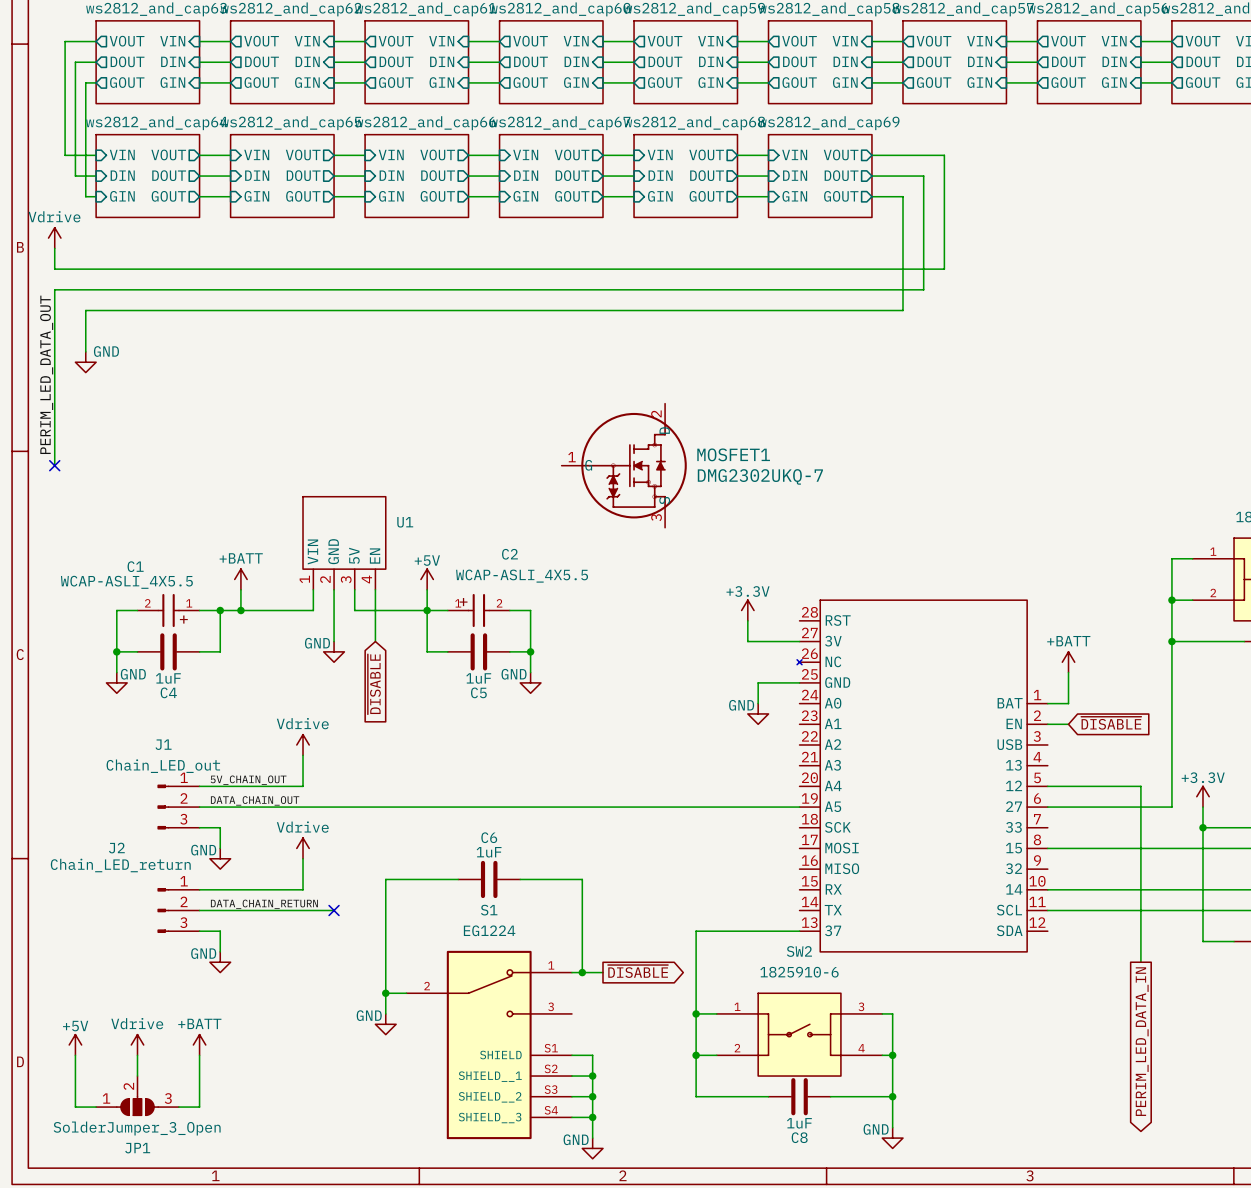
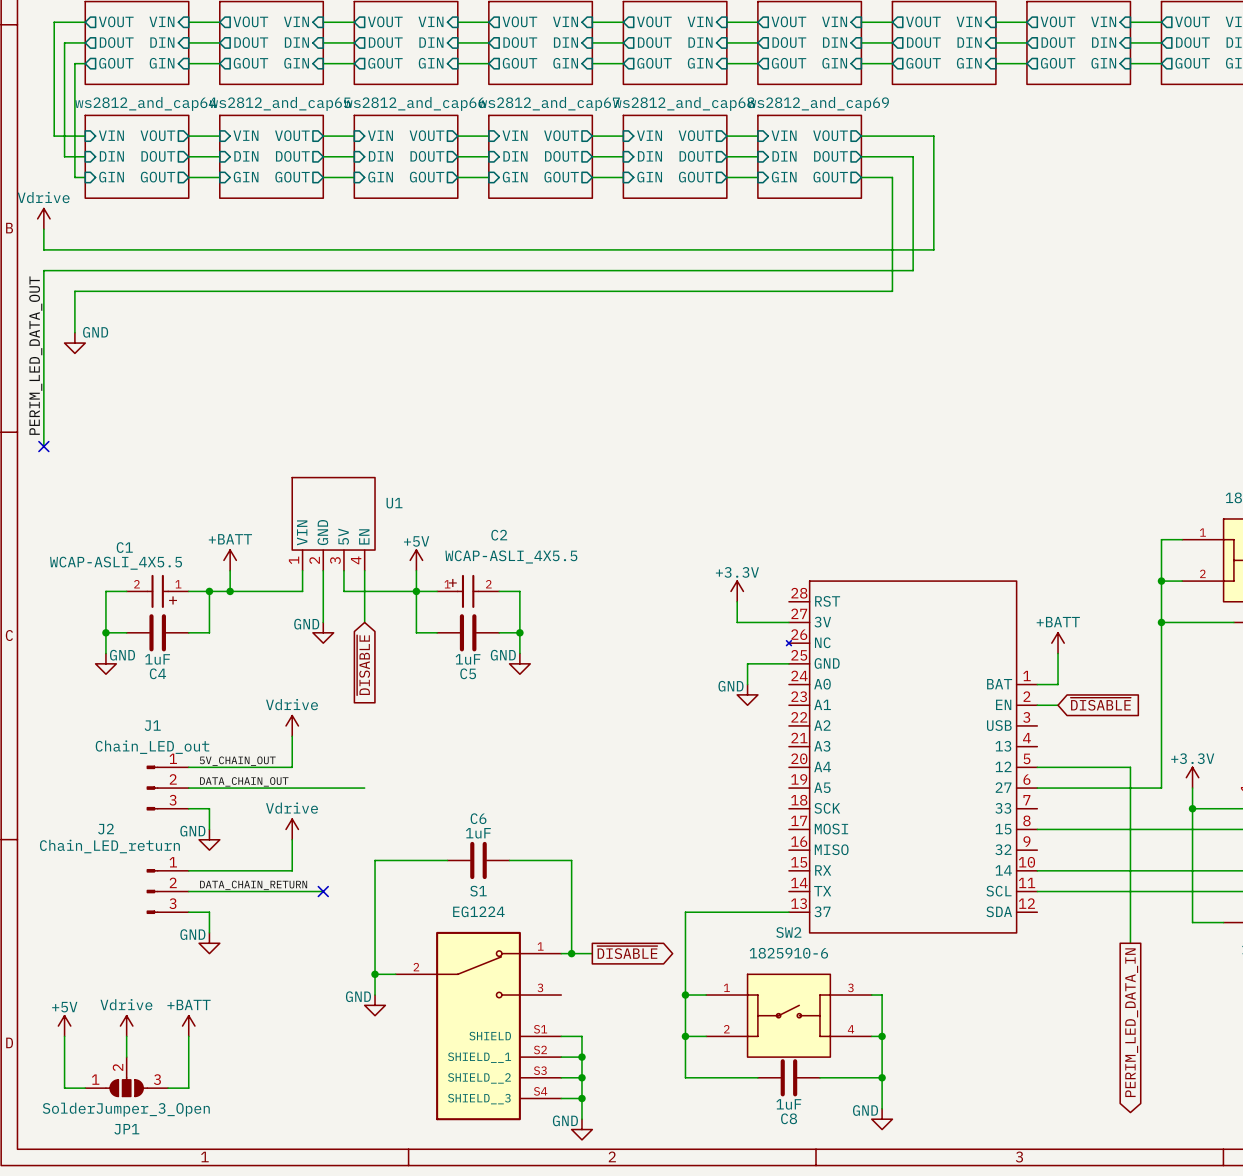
MOSFET1: DMG2302UKQ-7 (624, 465) -> none
wire: (375, 807) (799, 807) -> none

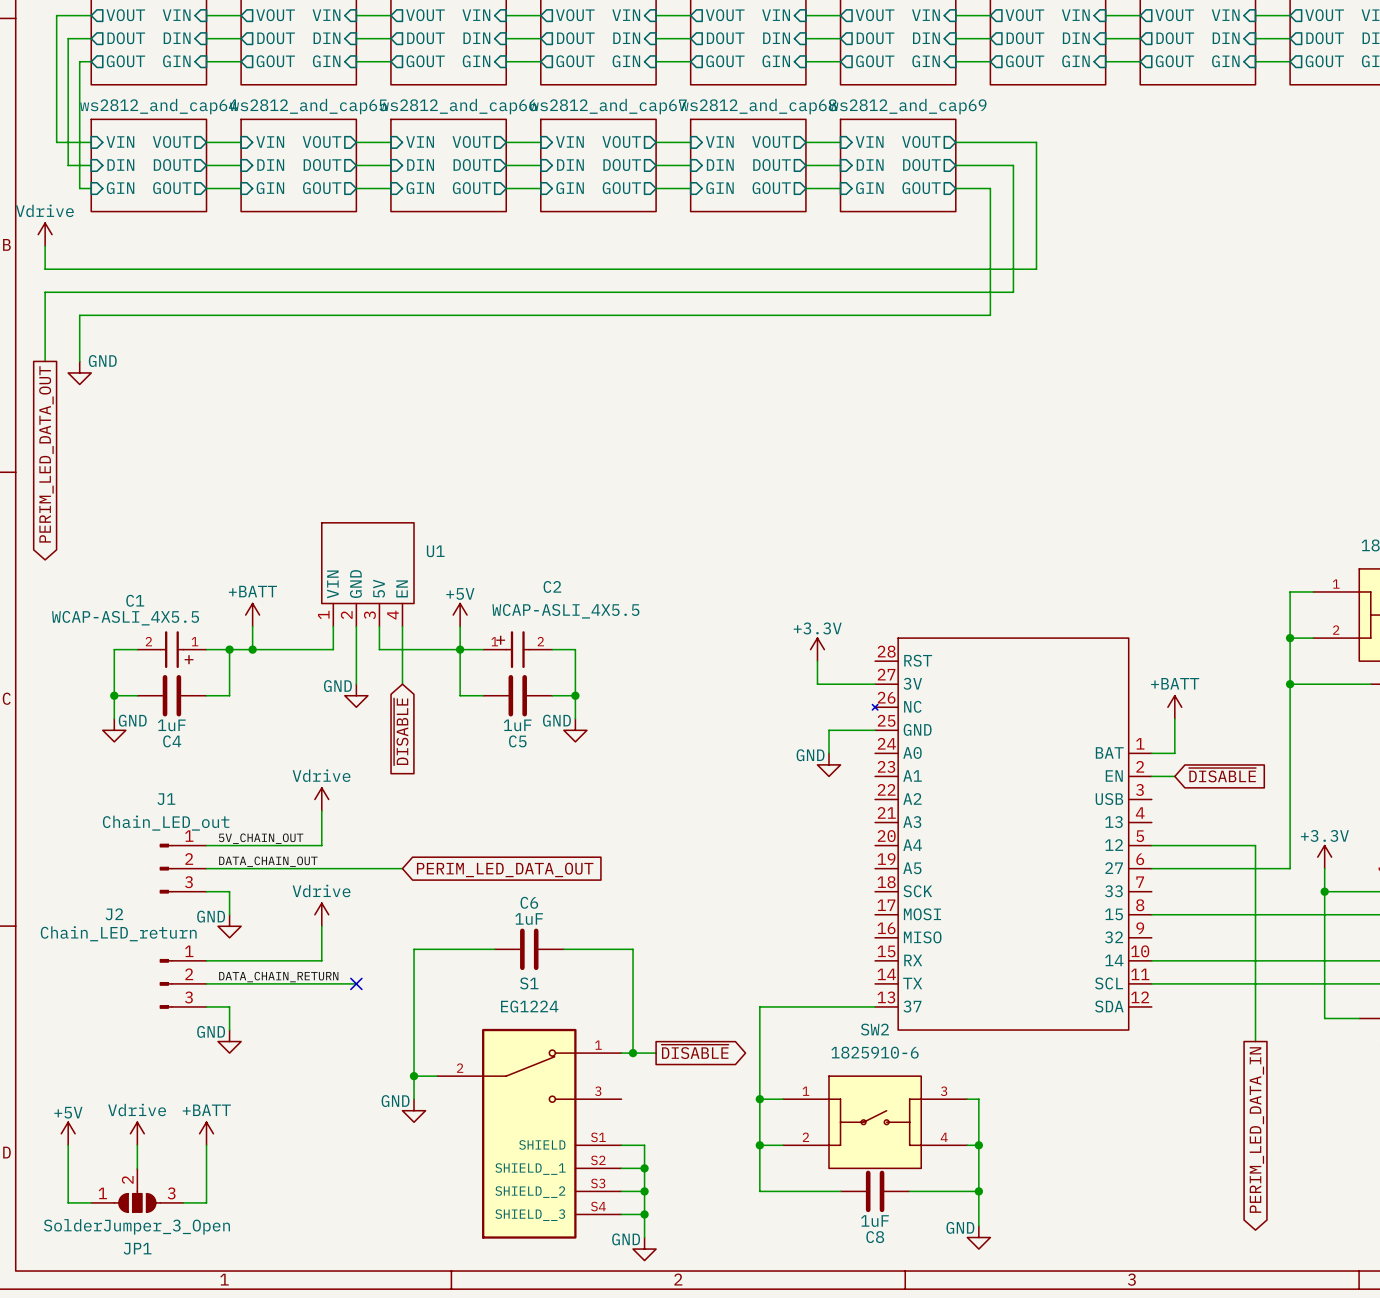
wire: (43, 332) (43, 446) -> none
label: PERIM_LED_DATA_OUT (35, 355) -> none
global label: none -> PERIM_LED_DATA_OUT (46, 454)
no-connect mark: (43, 446) -> none
global label: none -> PERIM_LED_DATA_OUT (505, 869)

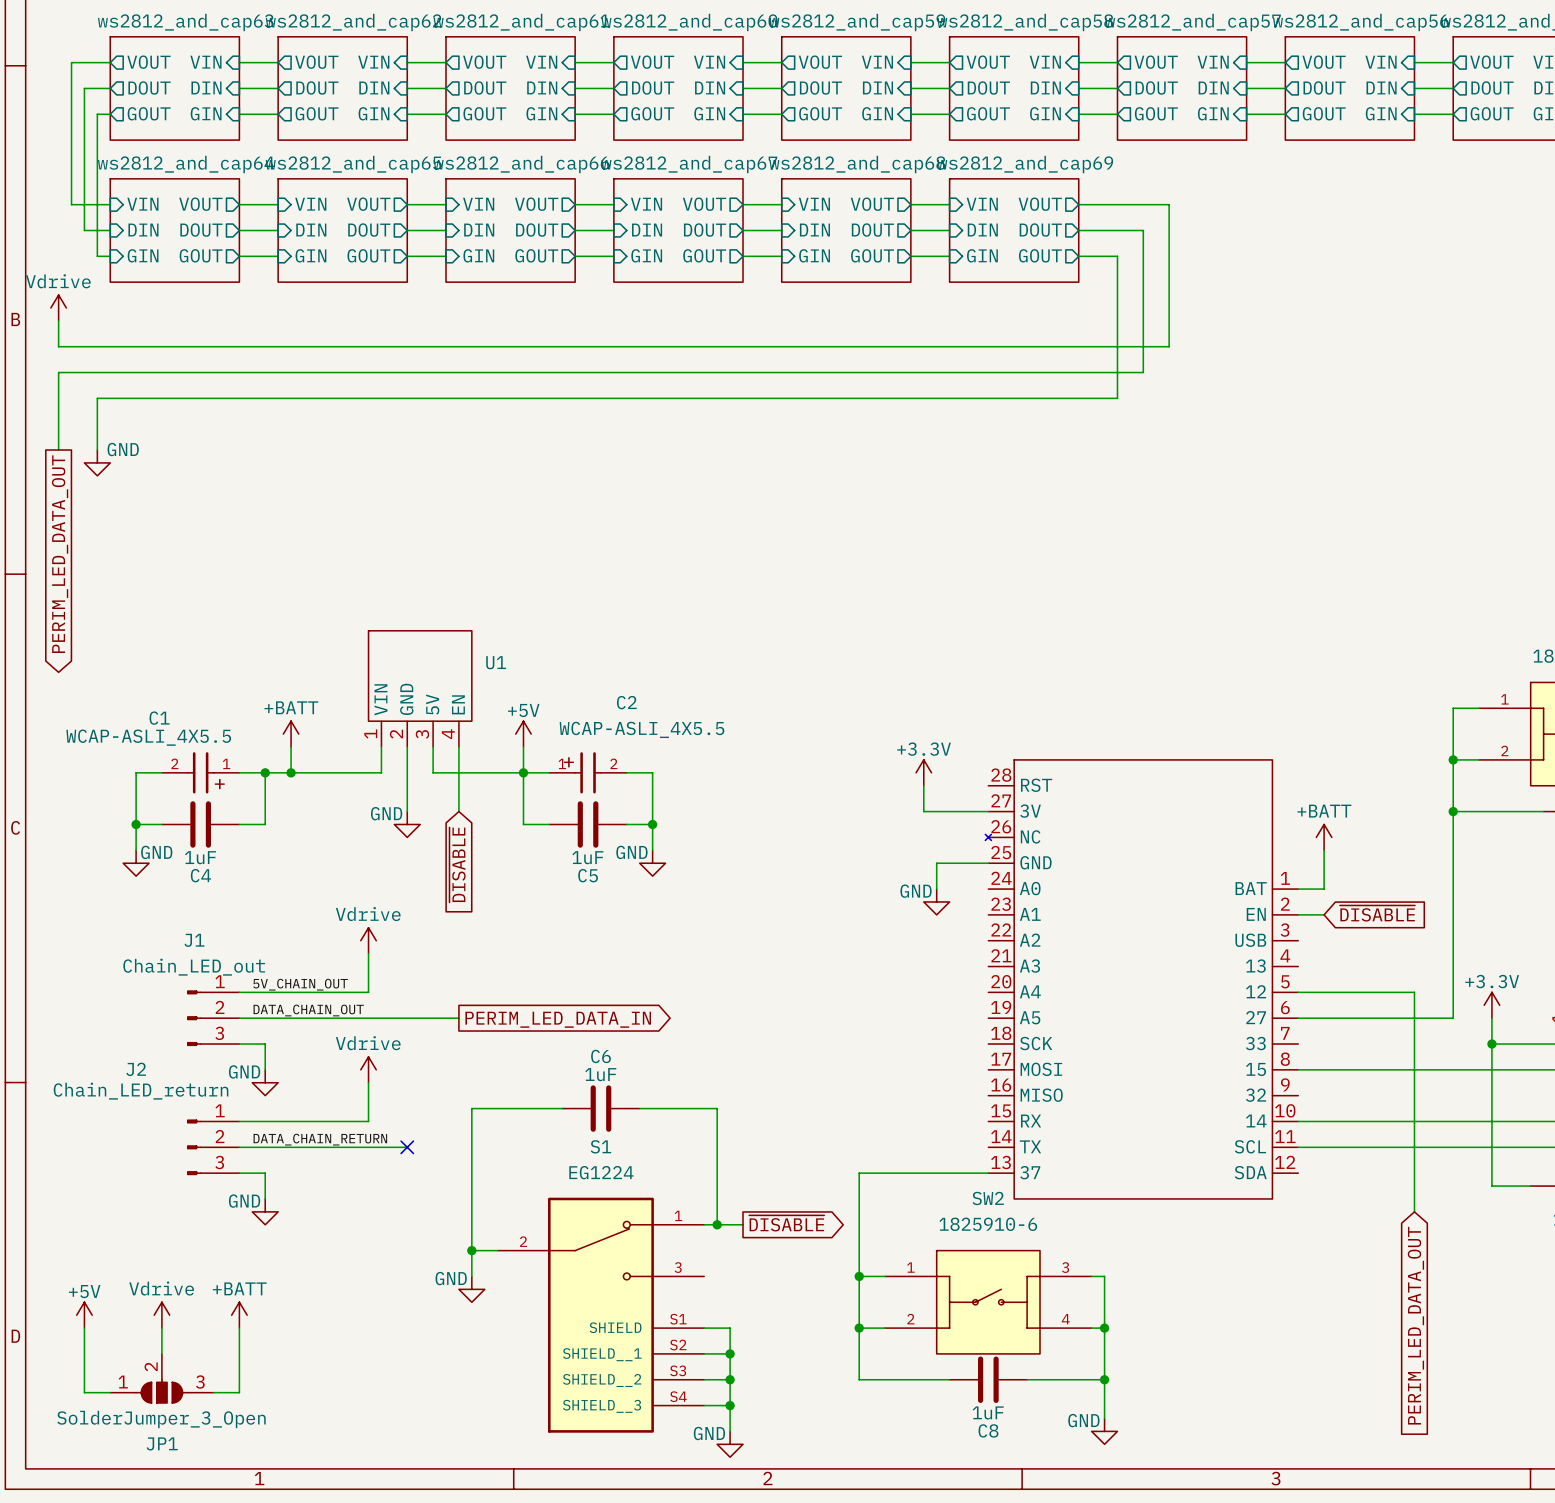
global label shape: input (505, 869) -> output (558, 1019)
global label: PERIM_LED_DATA_OUT (505, 869) -> PERIM_LED_DATA_IN (558, 1019)
global label shape: output (1256, 1130) -> input (1415, 1325)
global label: PERIM_LED_DATA_IN (1256, 1130) -> PERIM_LED_DATA_OUT (1415, 1325)

